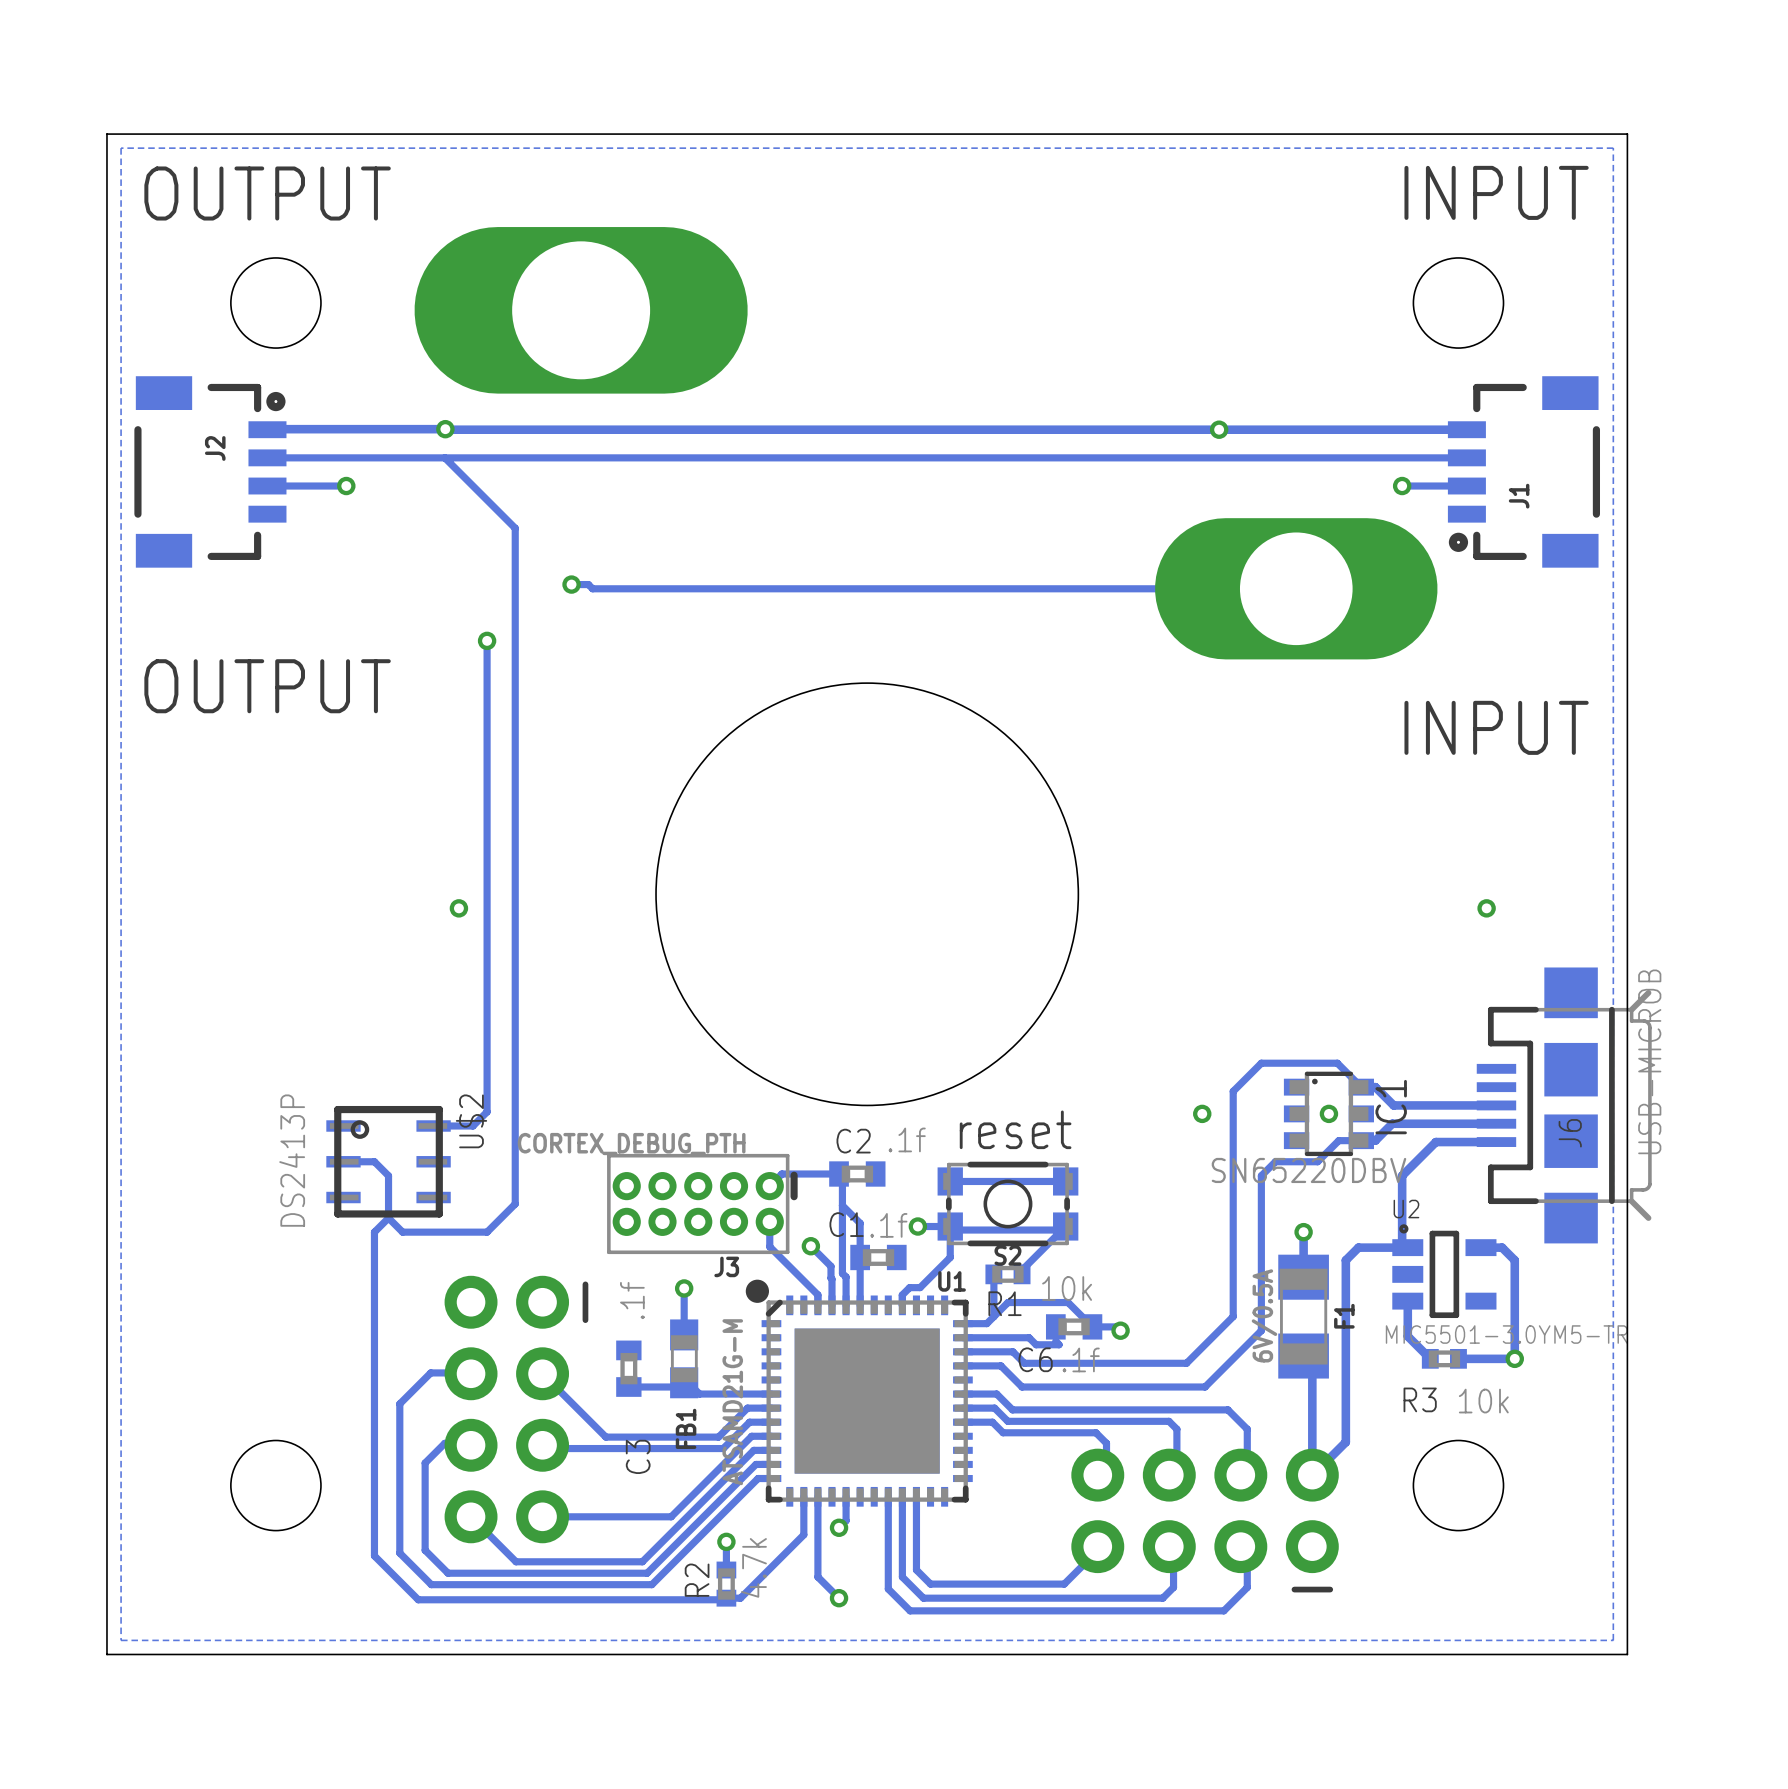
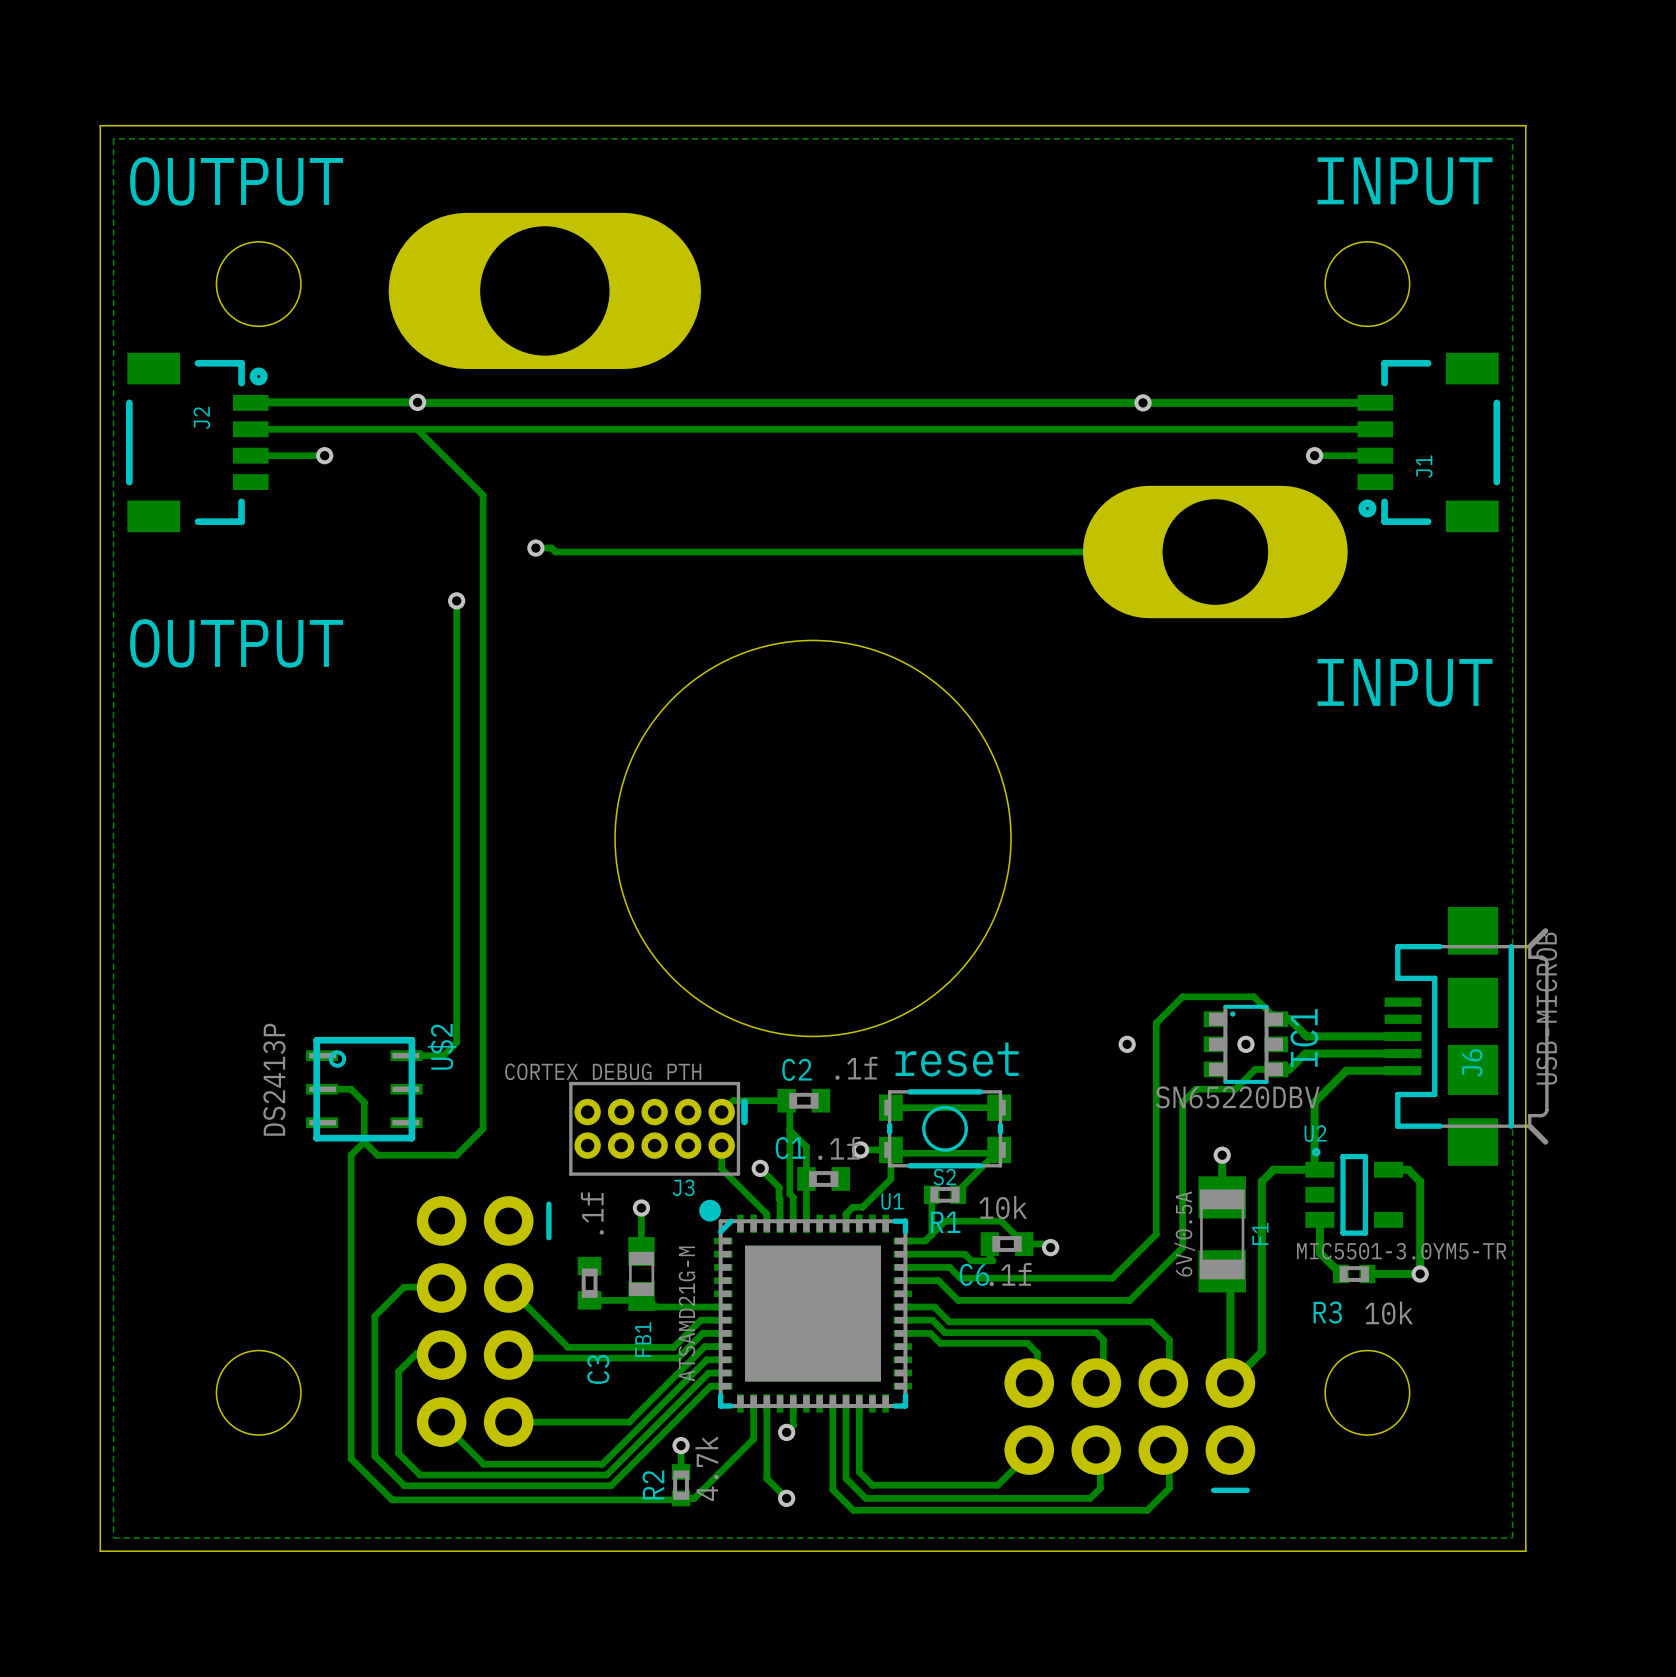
via: (458, 908) -> none
via: (1486, 908) -> none

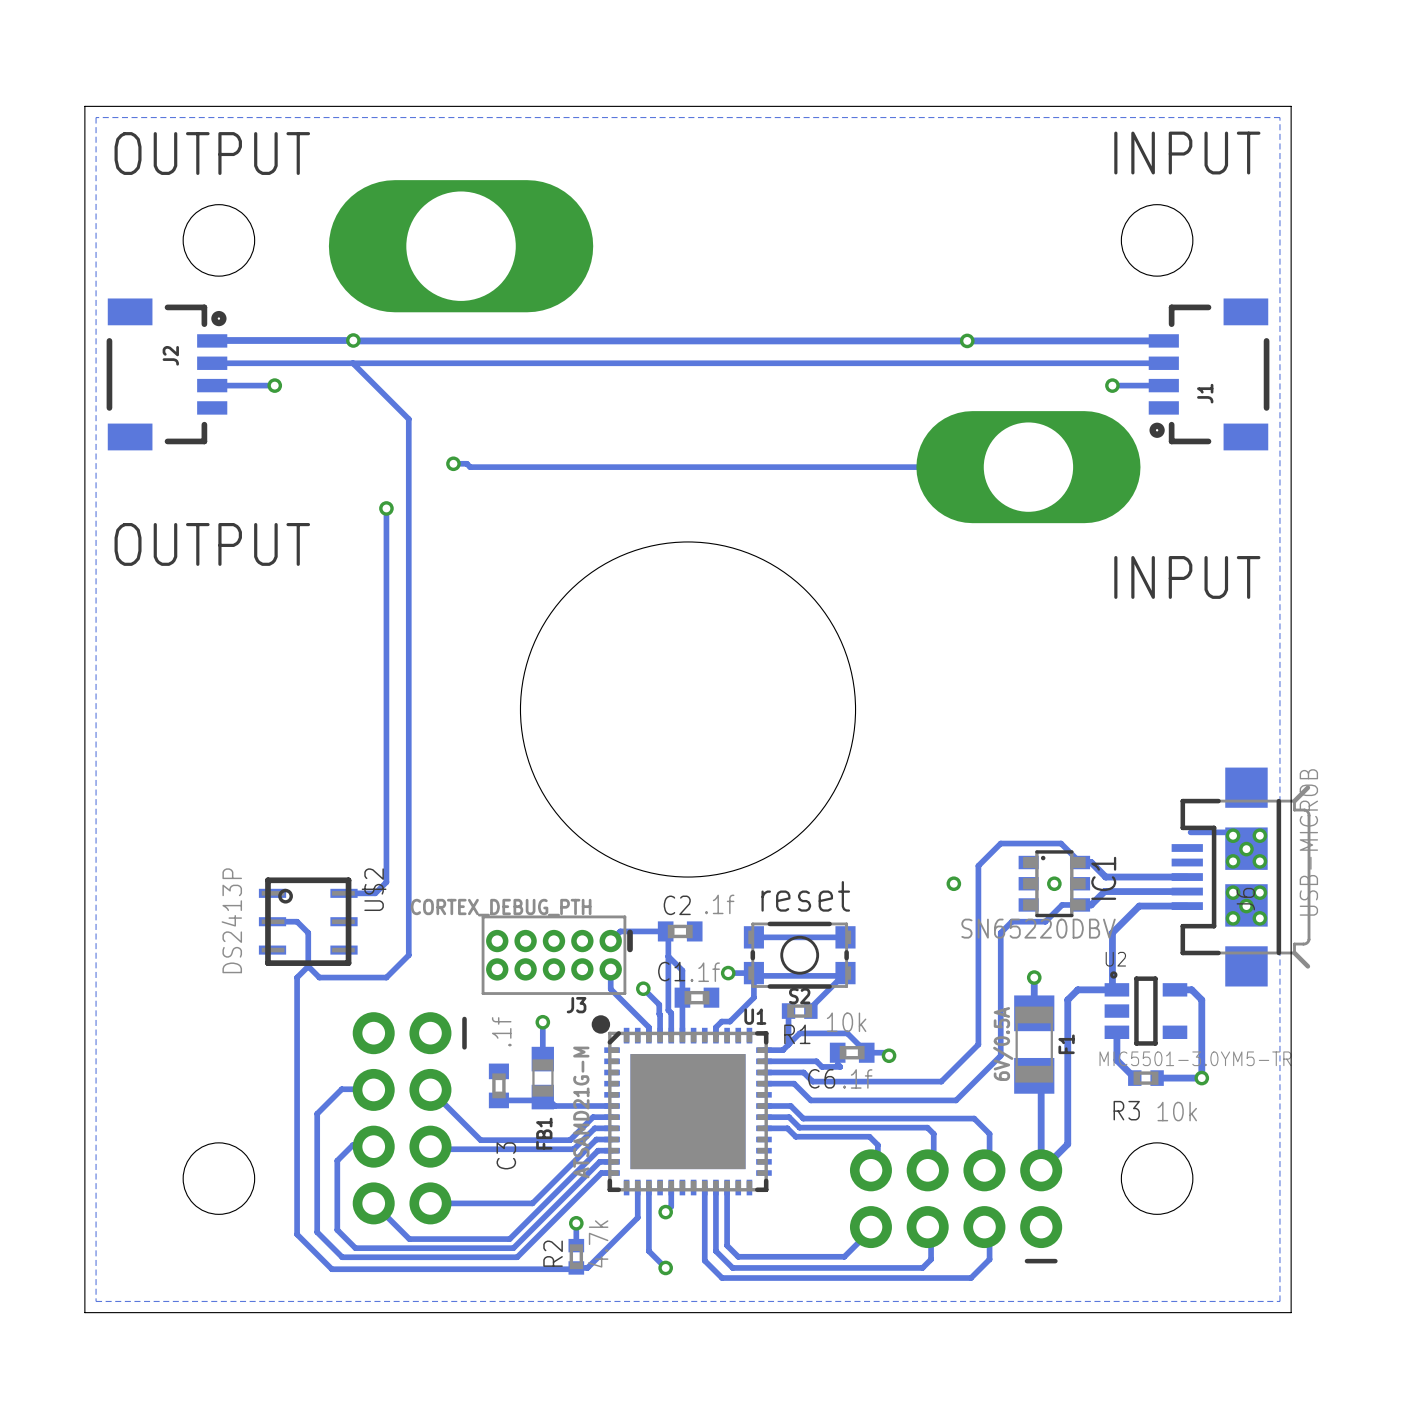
track: none -> (1190, 832) (1229, 832) (1233, 835)
via: none -> (1233, 835)
via: none -> (1259, 835)
via: none -> (1246, 849)
via: none -> (1233, 861)
via: none -> (1259, 861)
via: none -> (1233, 892)
via: none -> (1259, 892)
via: none -> (1246, 906)
via: none -> (1233, 918)
via: none -> (1259, 918)

